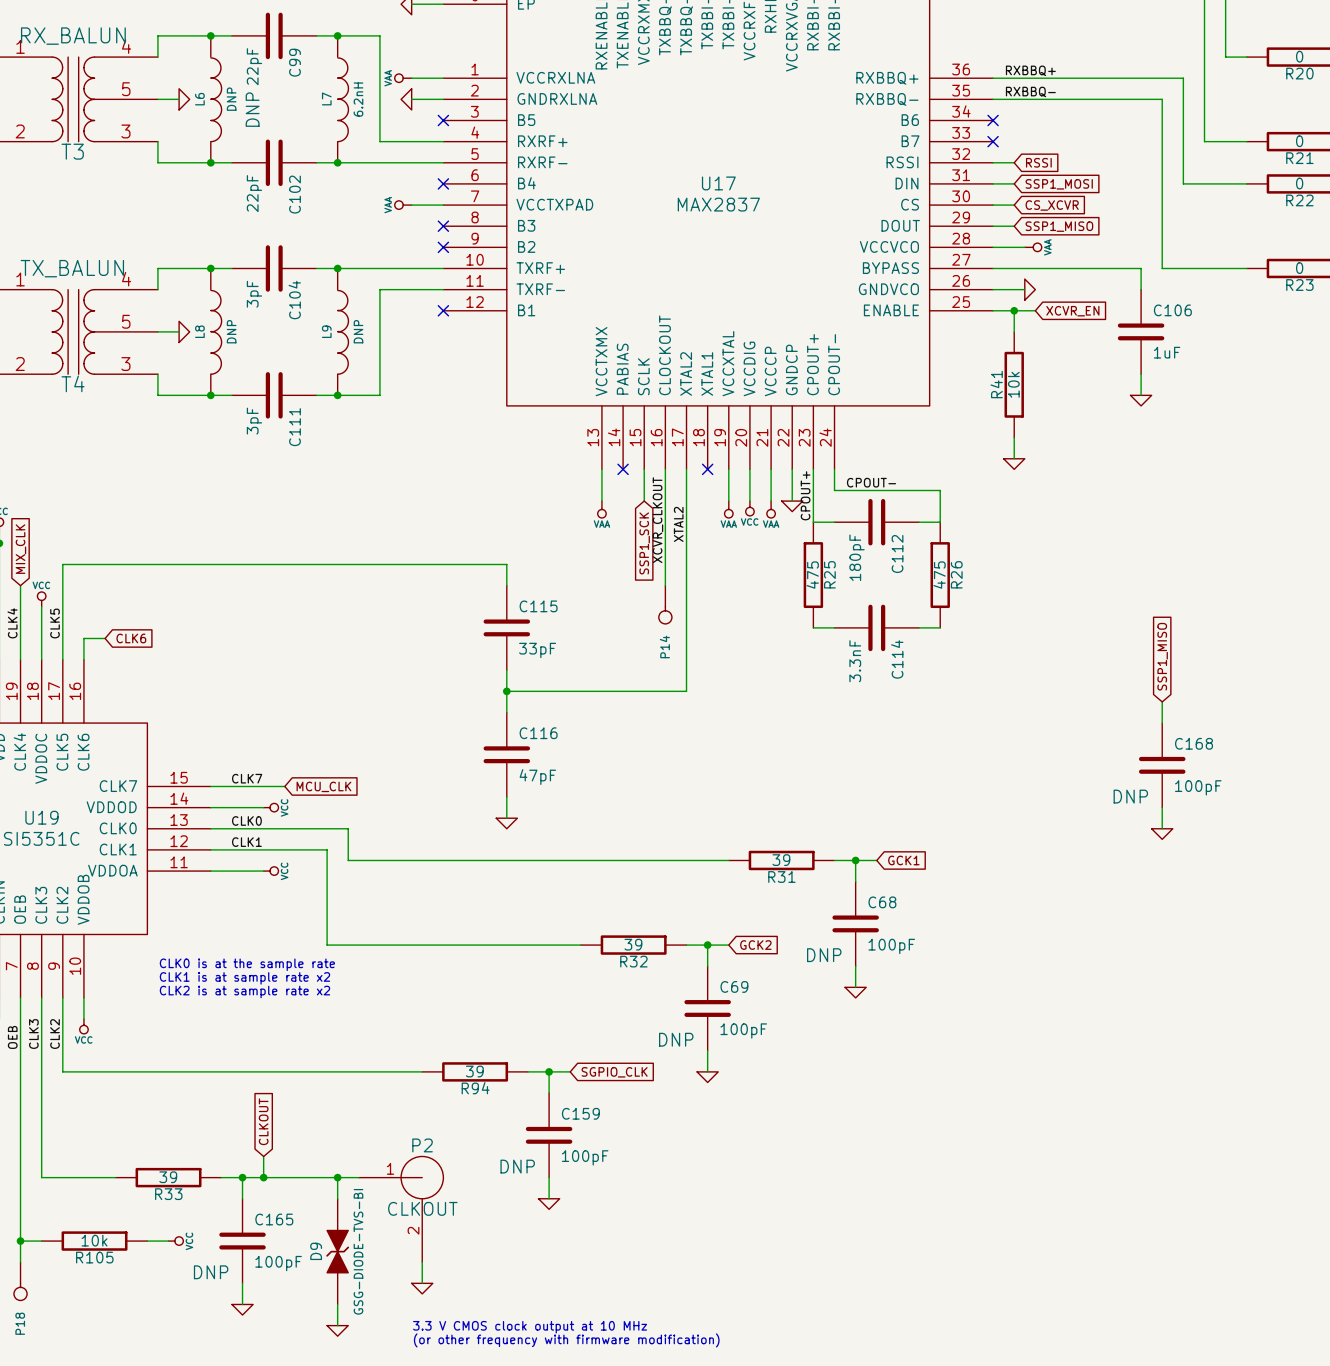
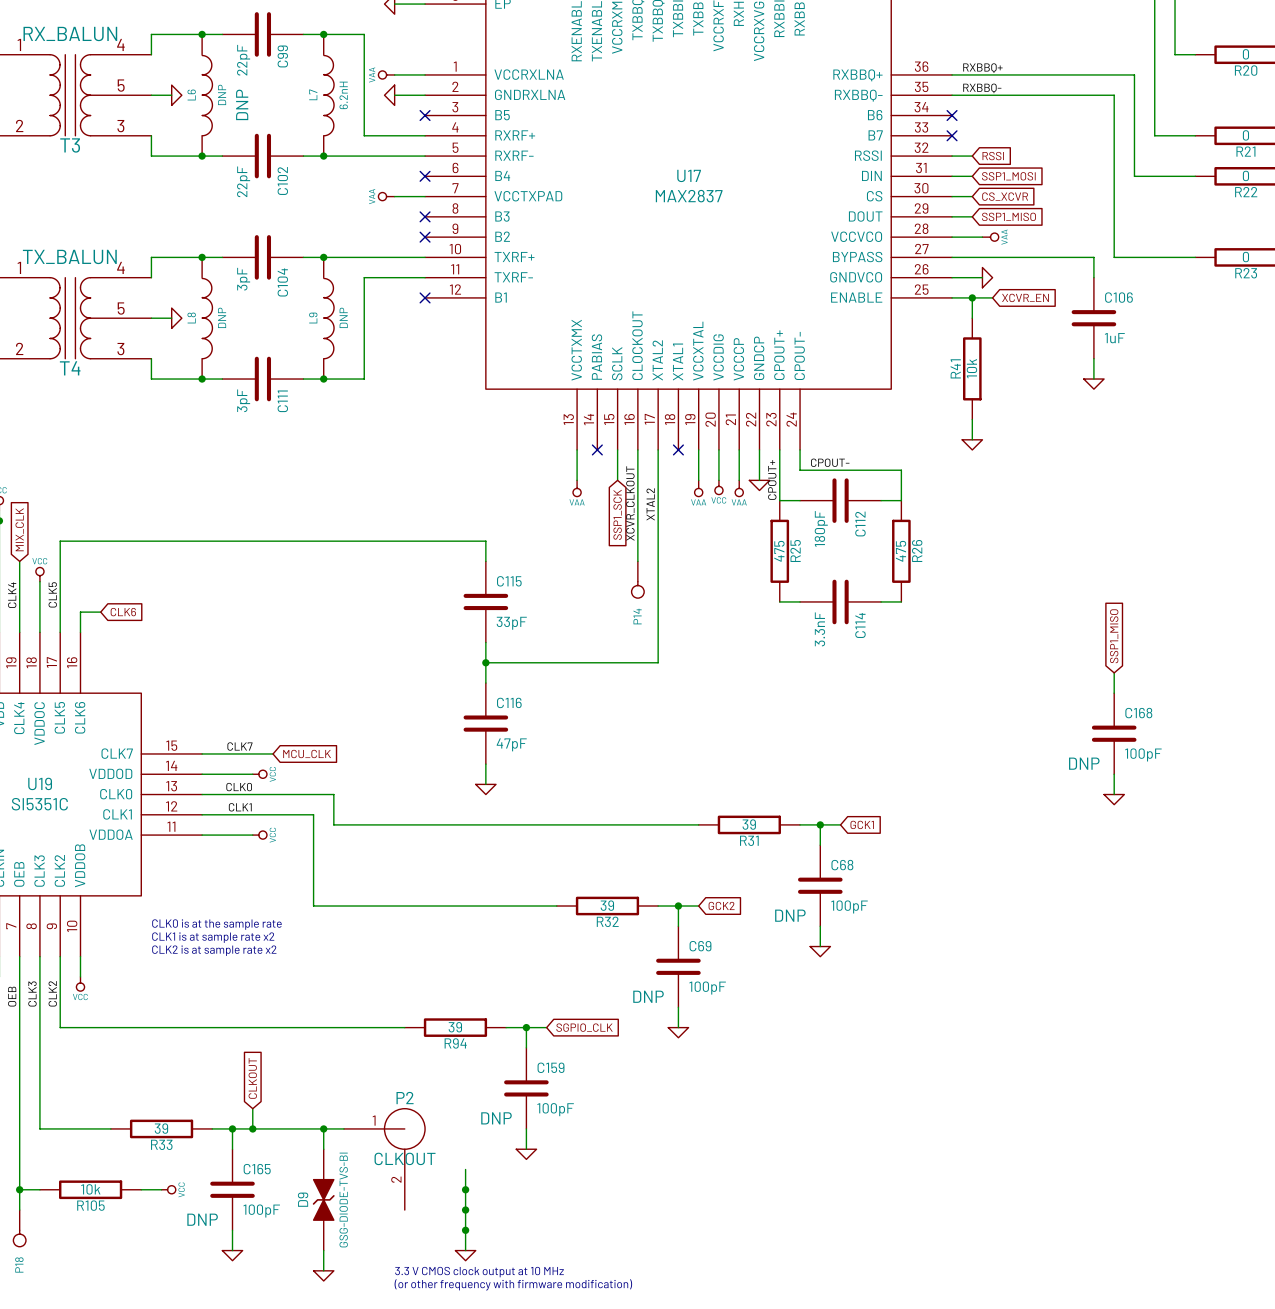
wire: none -> (465, 1169) (465, 1250)
junction: none -> (465, 1189)
wire: (422, 1262) (422, 1283) -> none
junction: none -> (465, 1210)
junction: none -> (465, 1230)
power symbol position: (422, 1288) -> (465, 1255)

